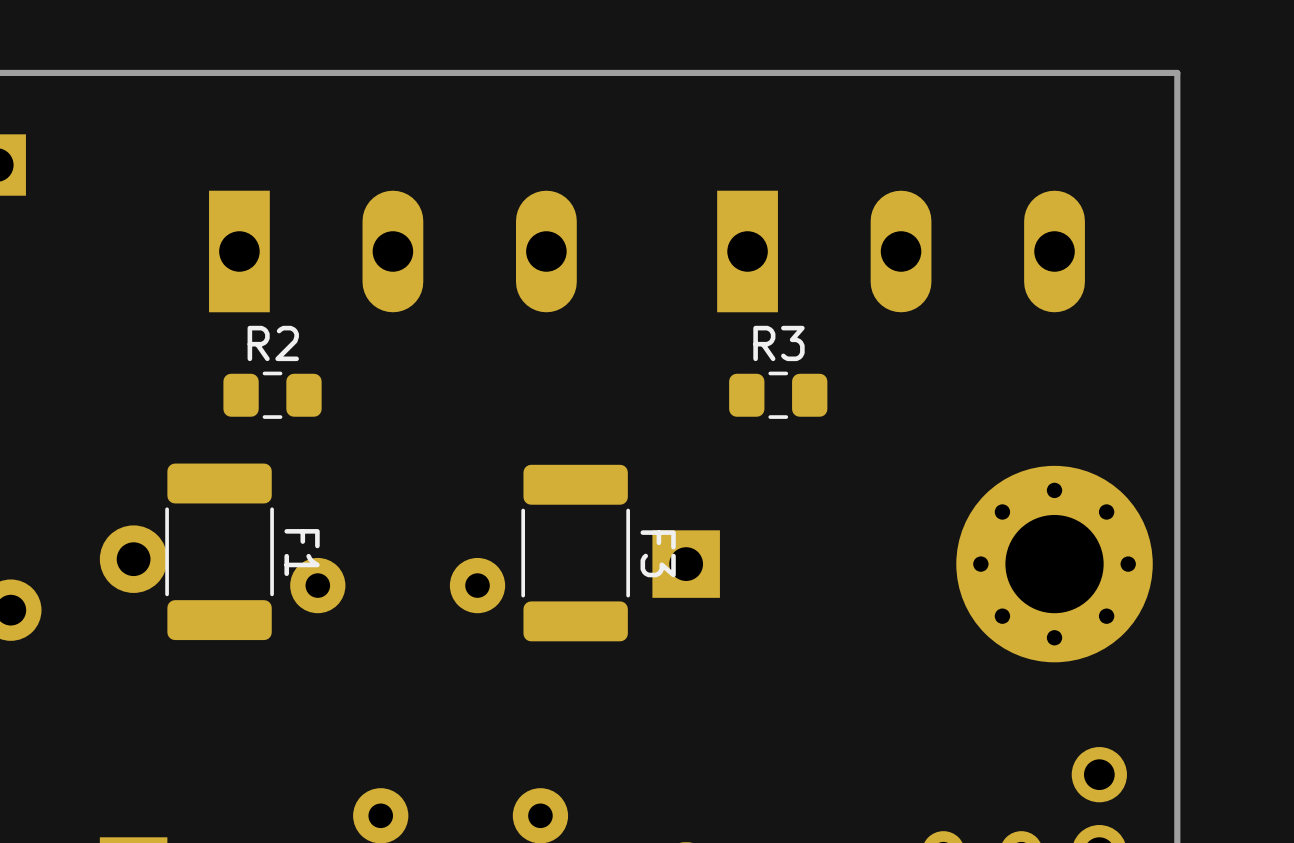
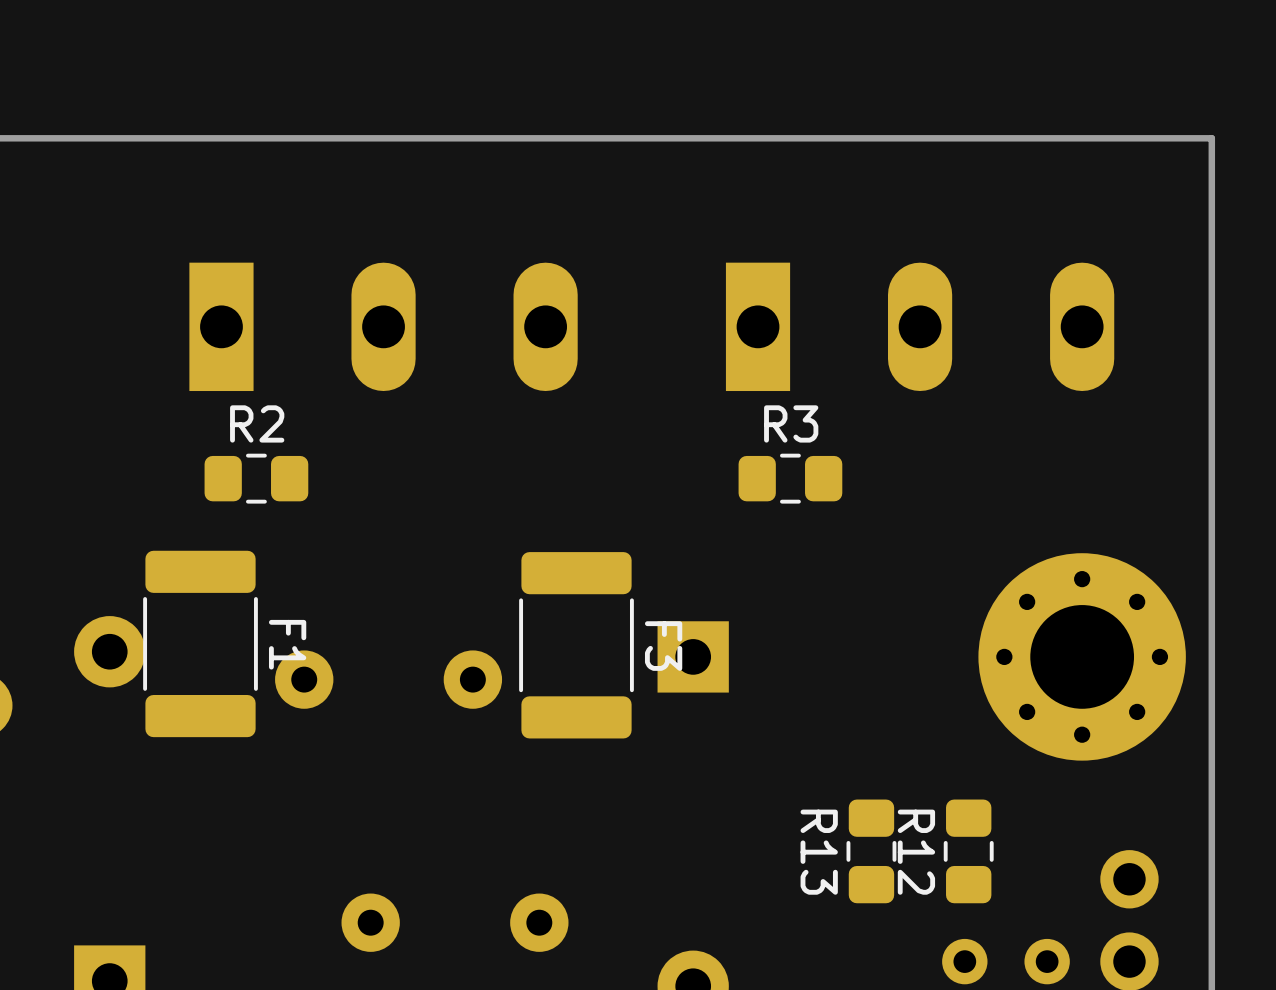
R13: none -> (871, 851)
R12: none -> (968, 851)

